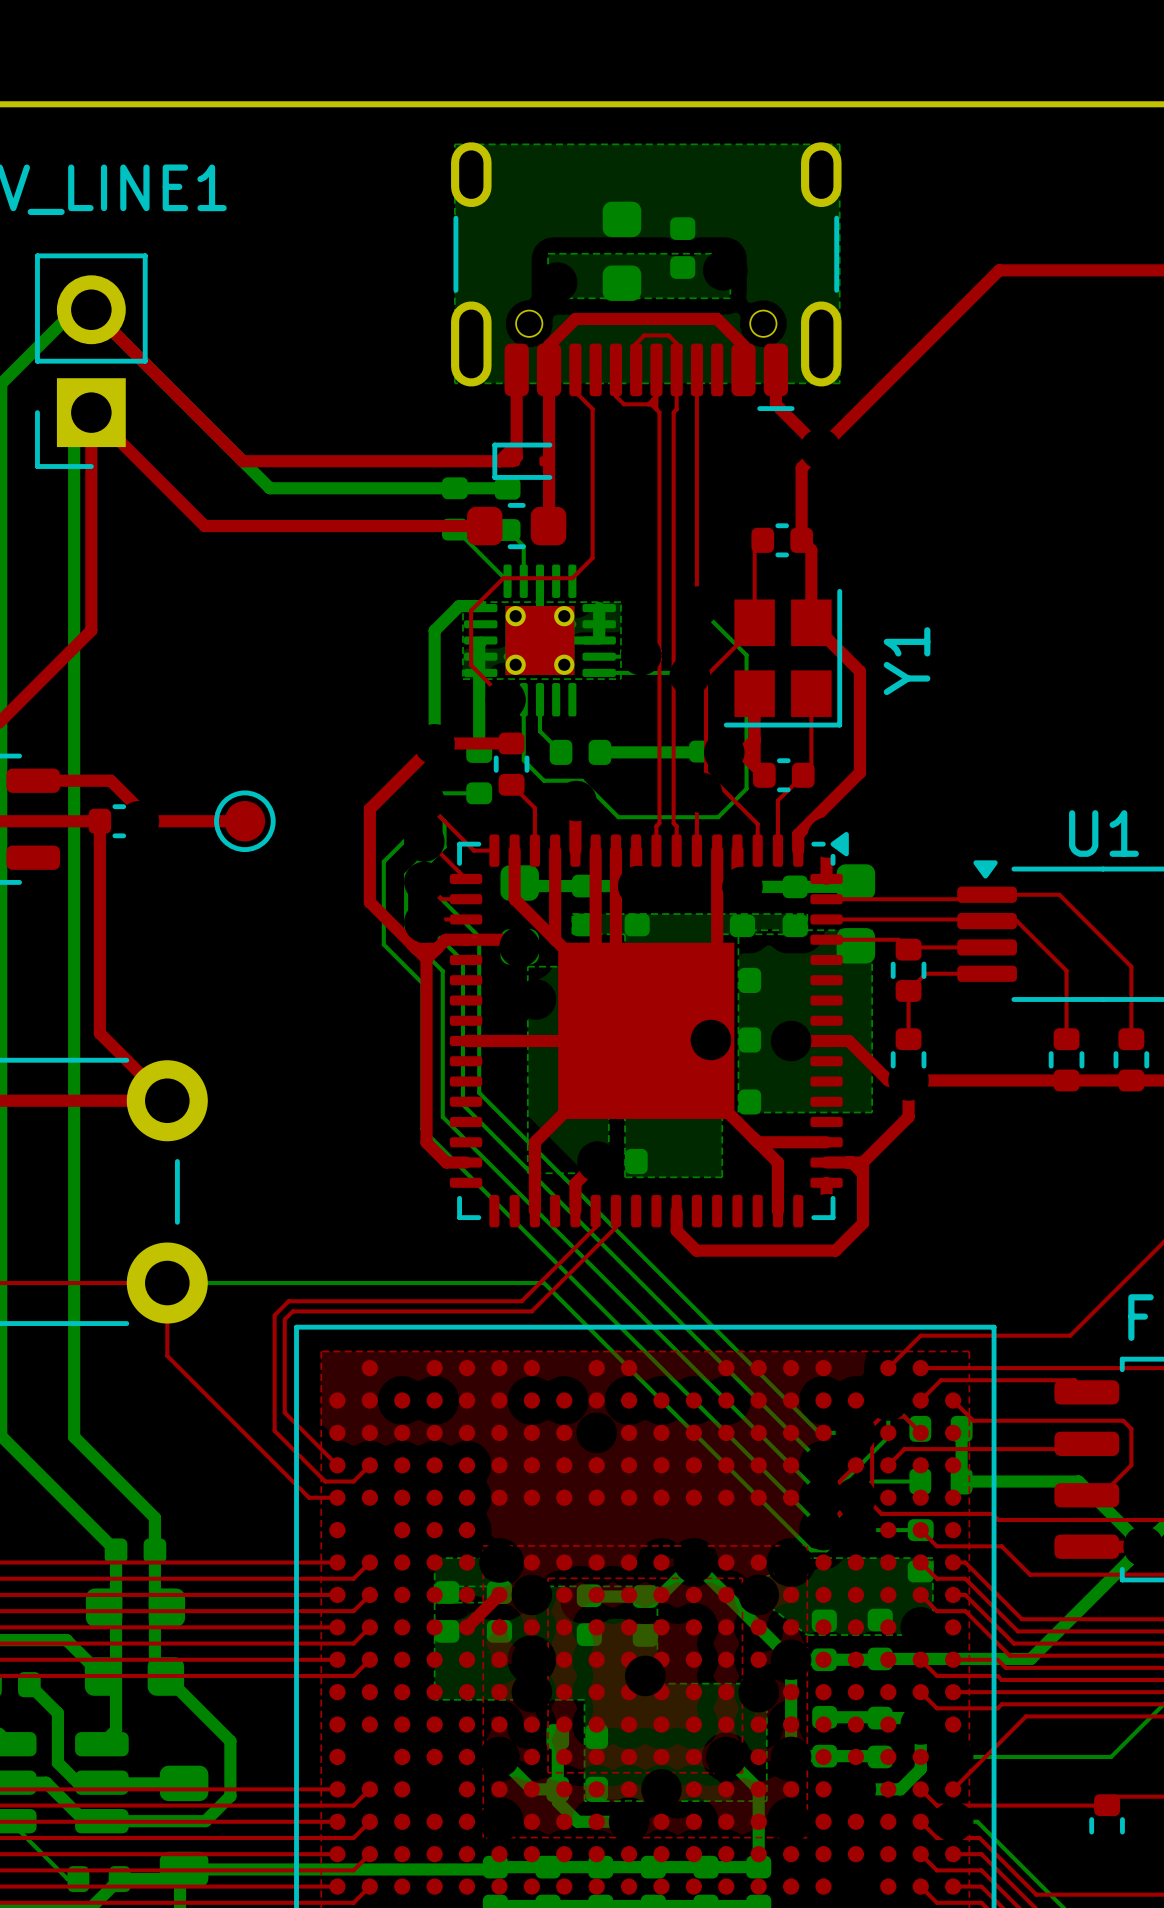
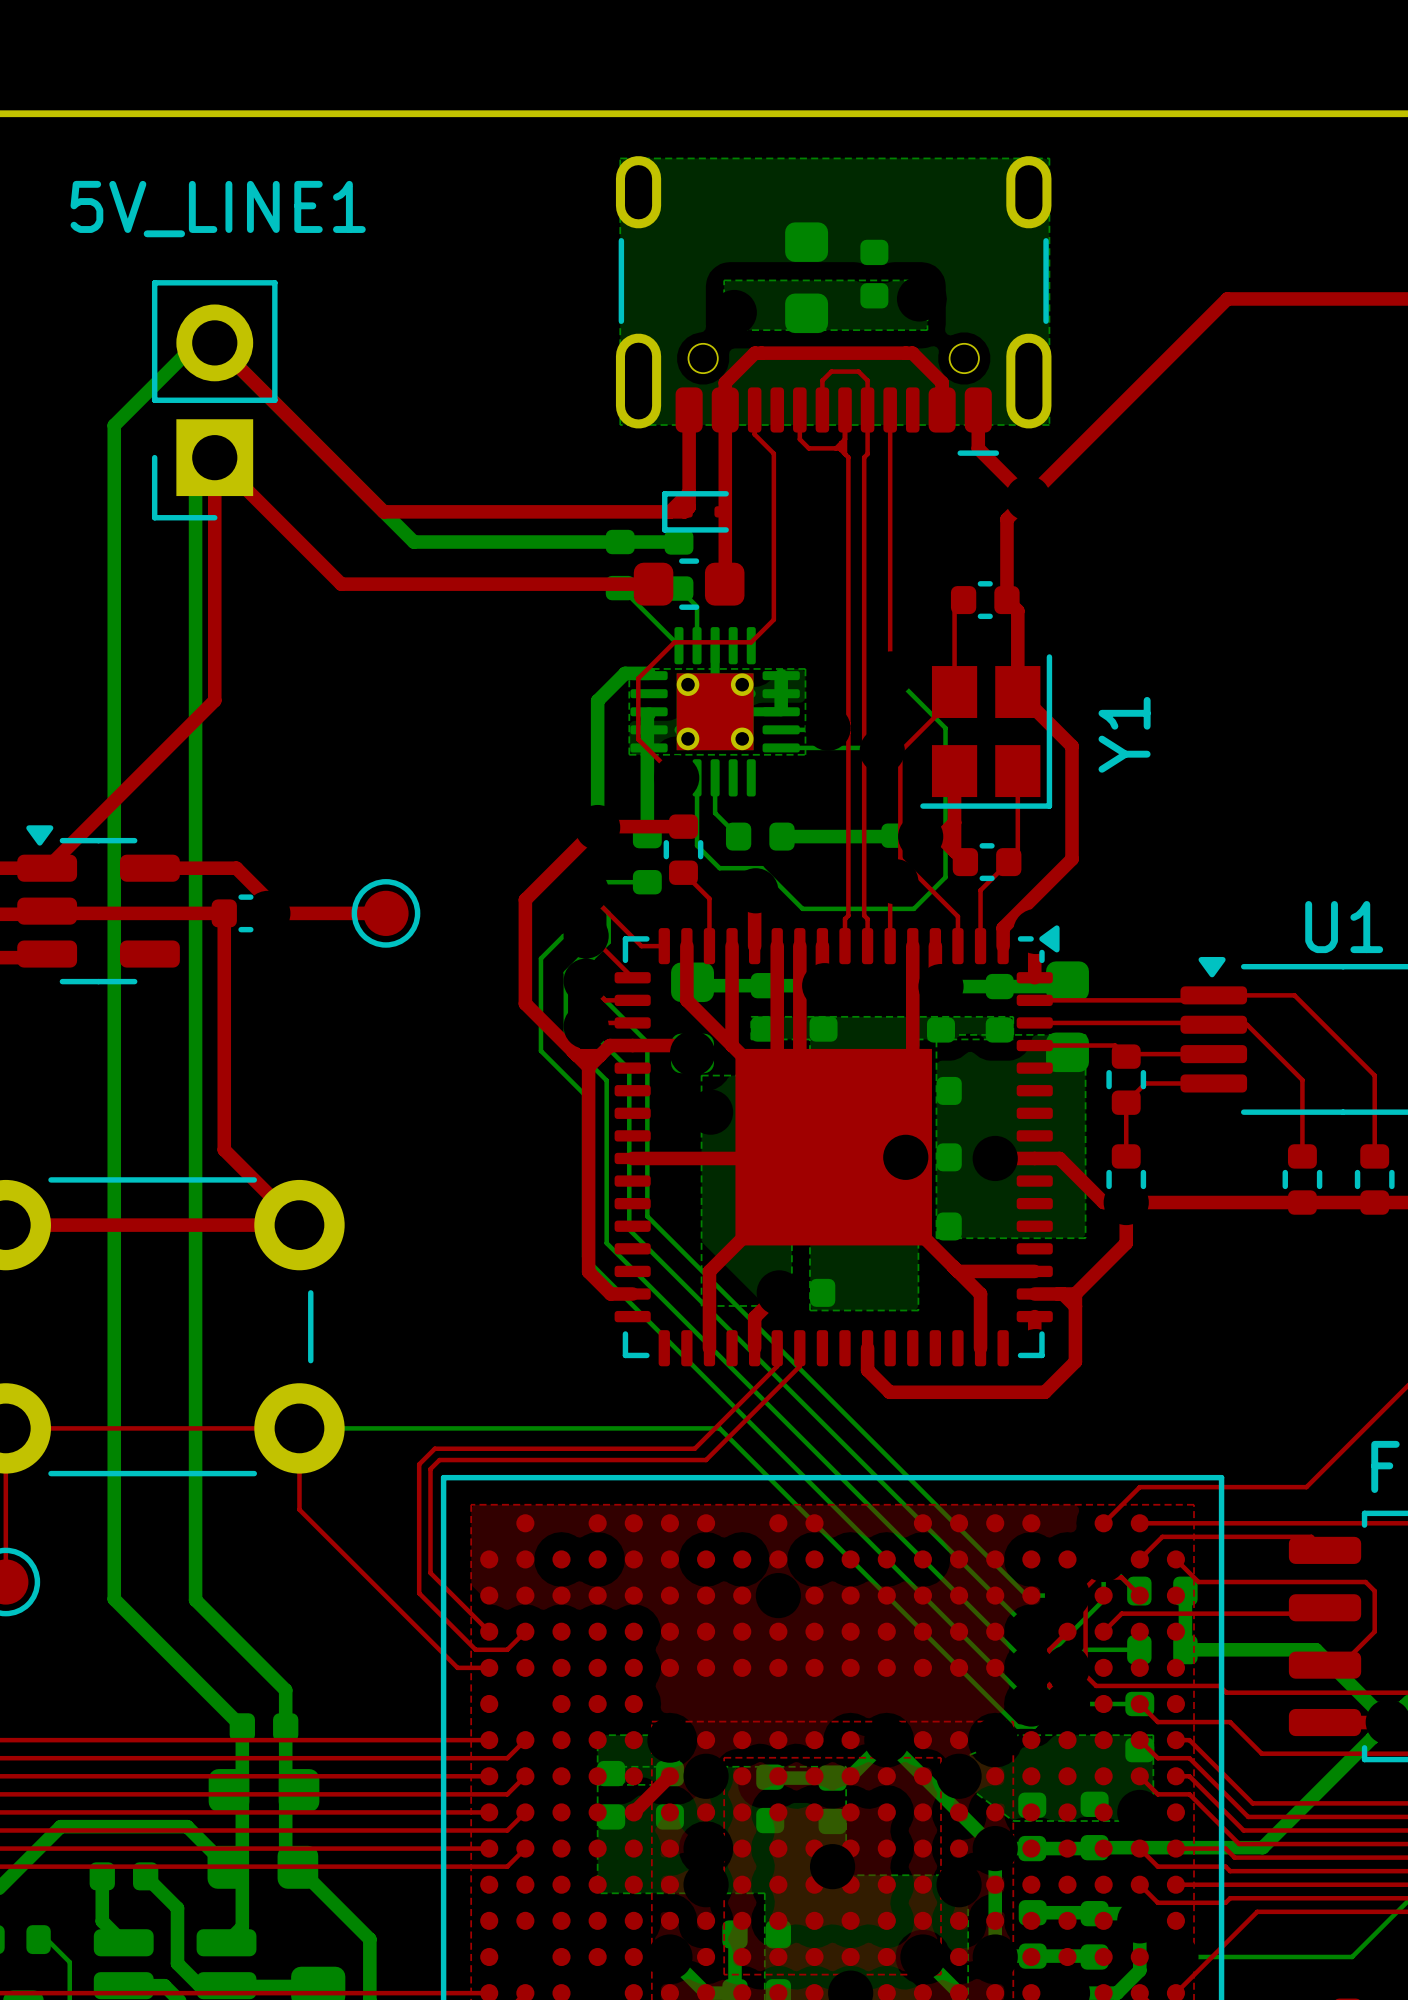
part footprint: [451, 142, 842, 412] -> [615, 156, 1052, 456]

